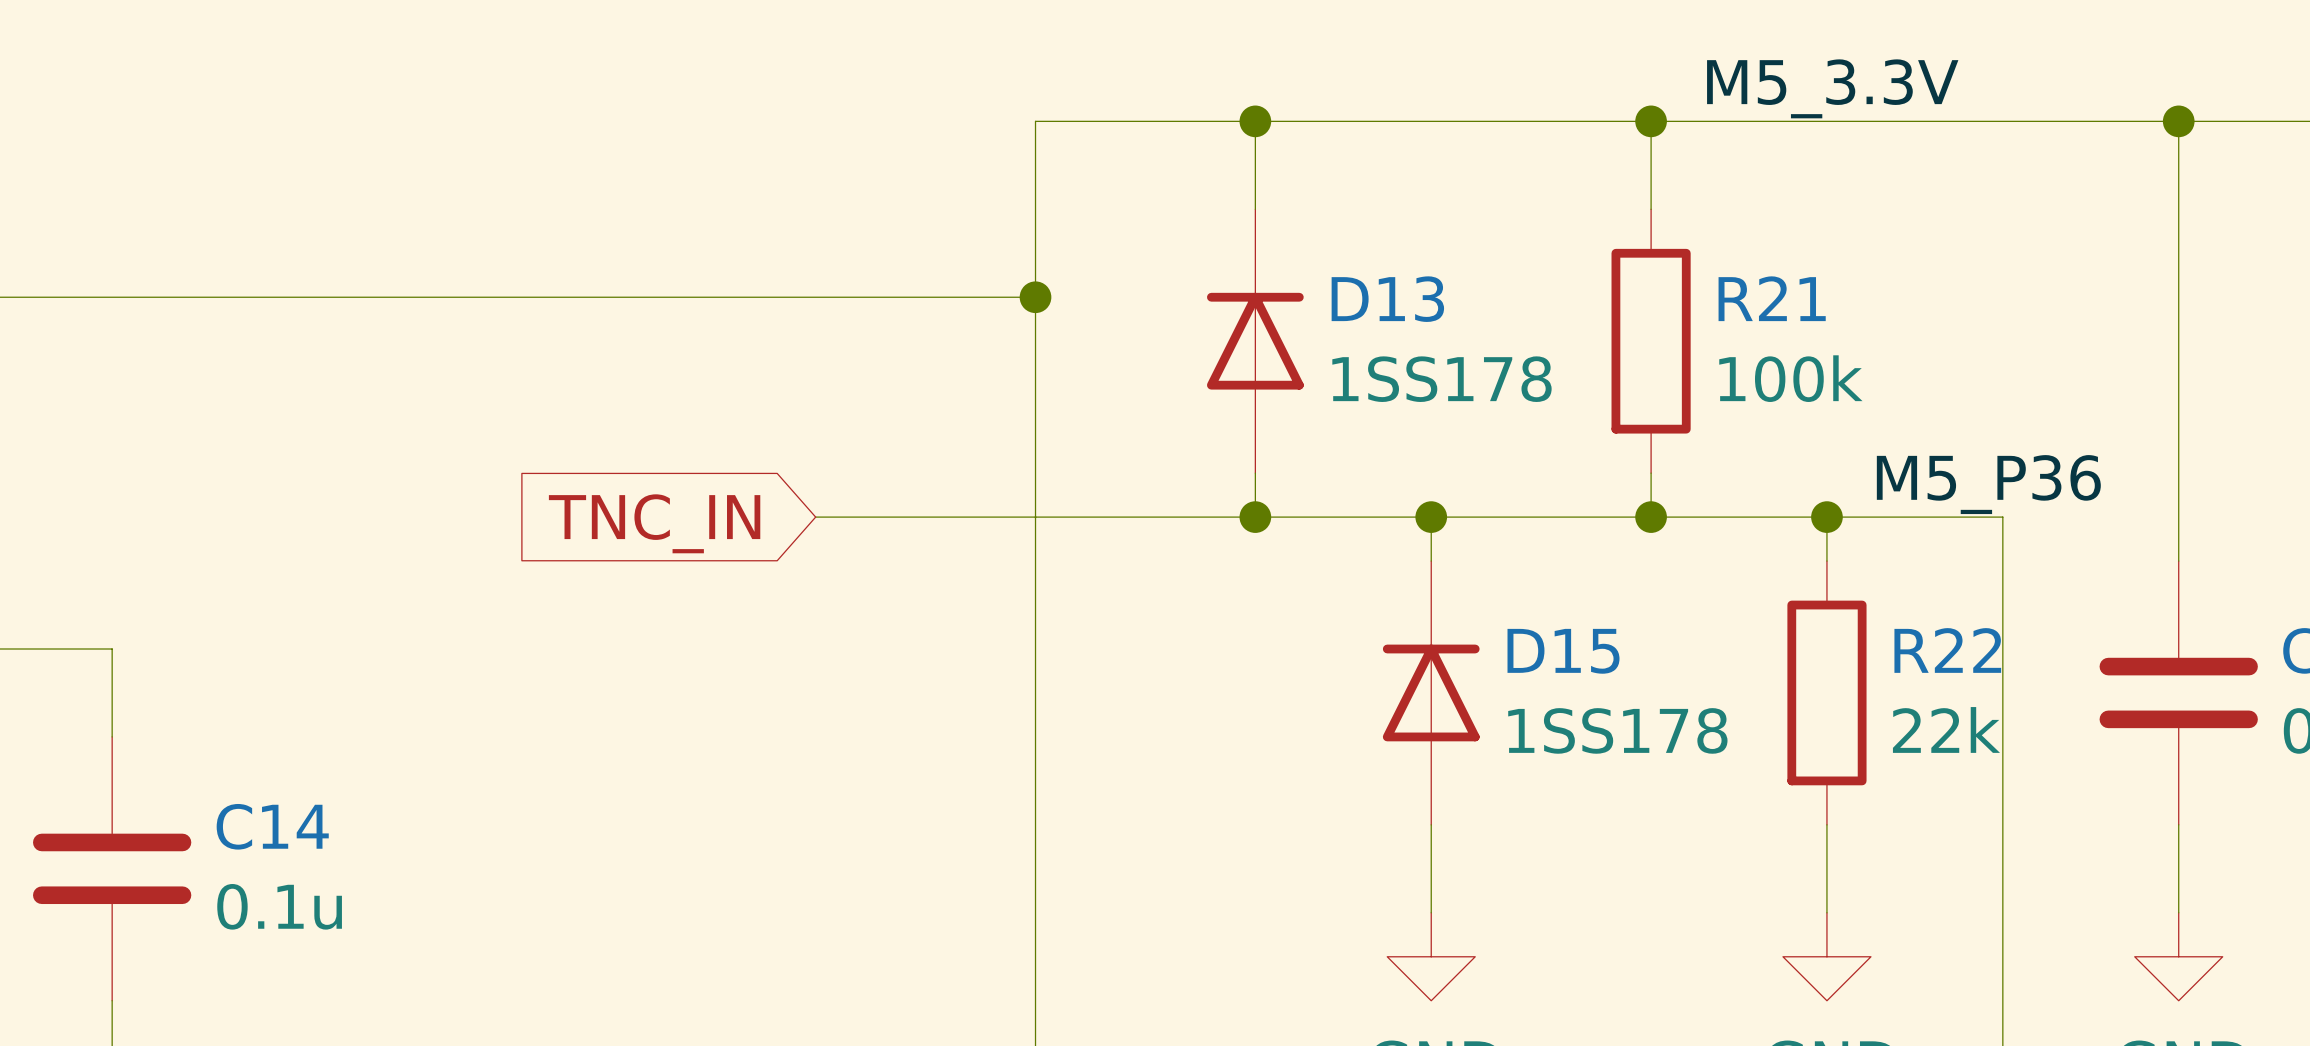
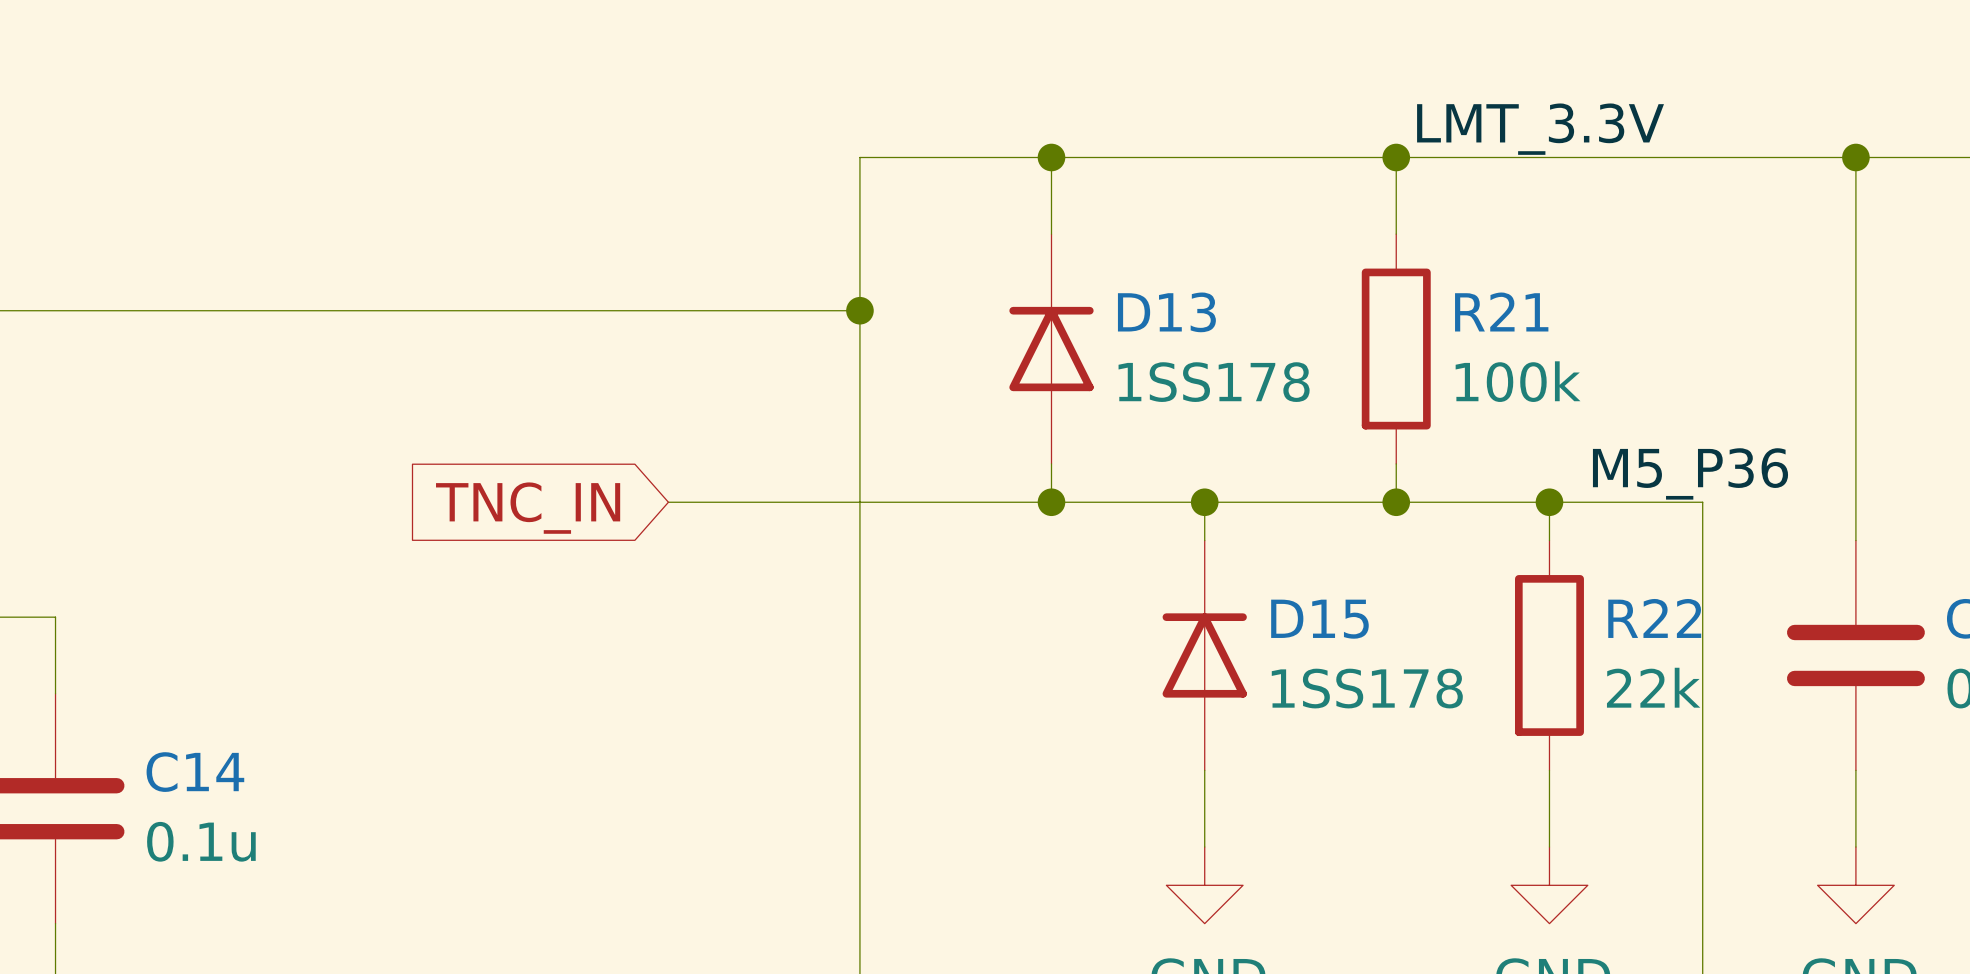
label: M5_3.3V (1832, 88) -> LMT_3.3V (1540, 129)

